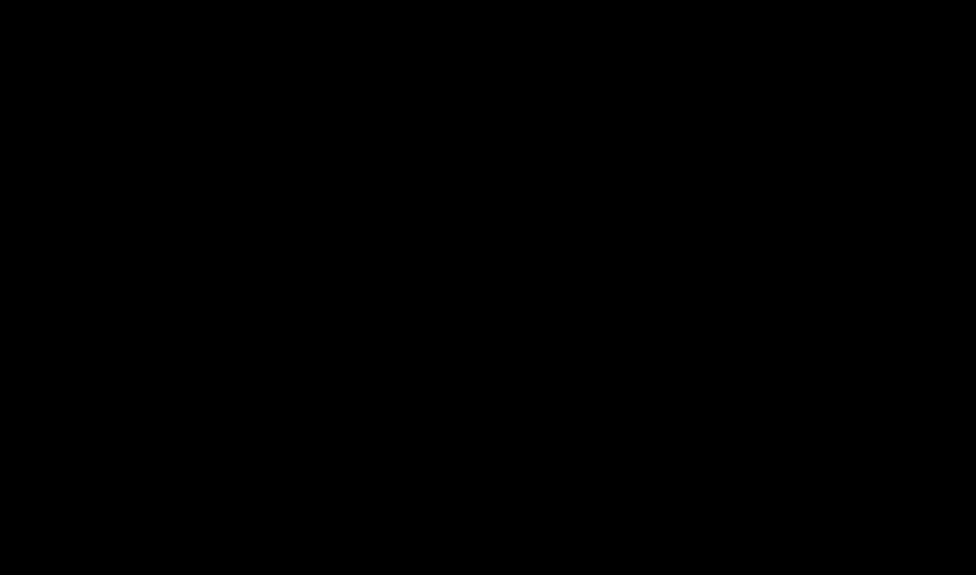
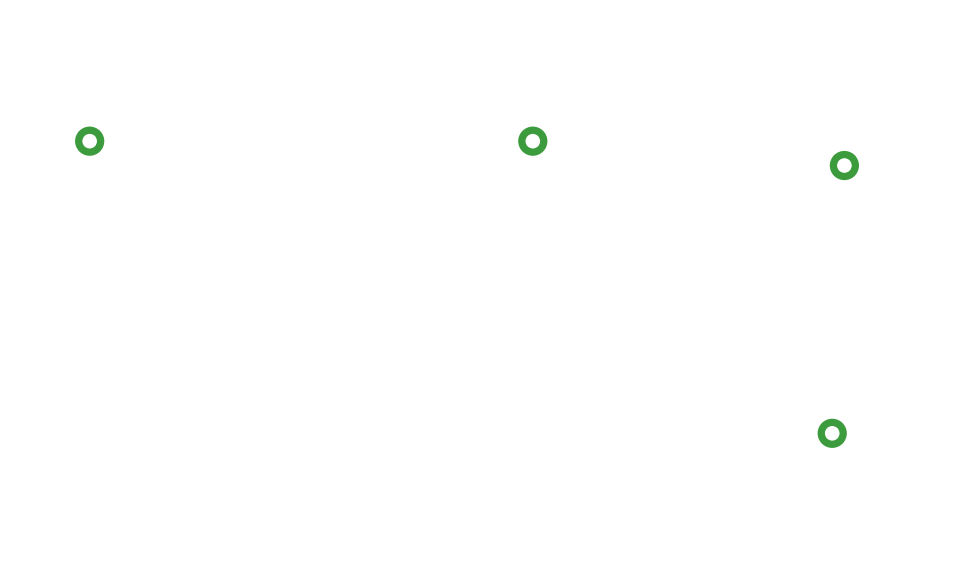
via: none -> (89, 141)
via: none -> (532, 141)
via: none -> (844, 165)
via: none -> (832, 433)

